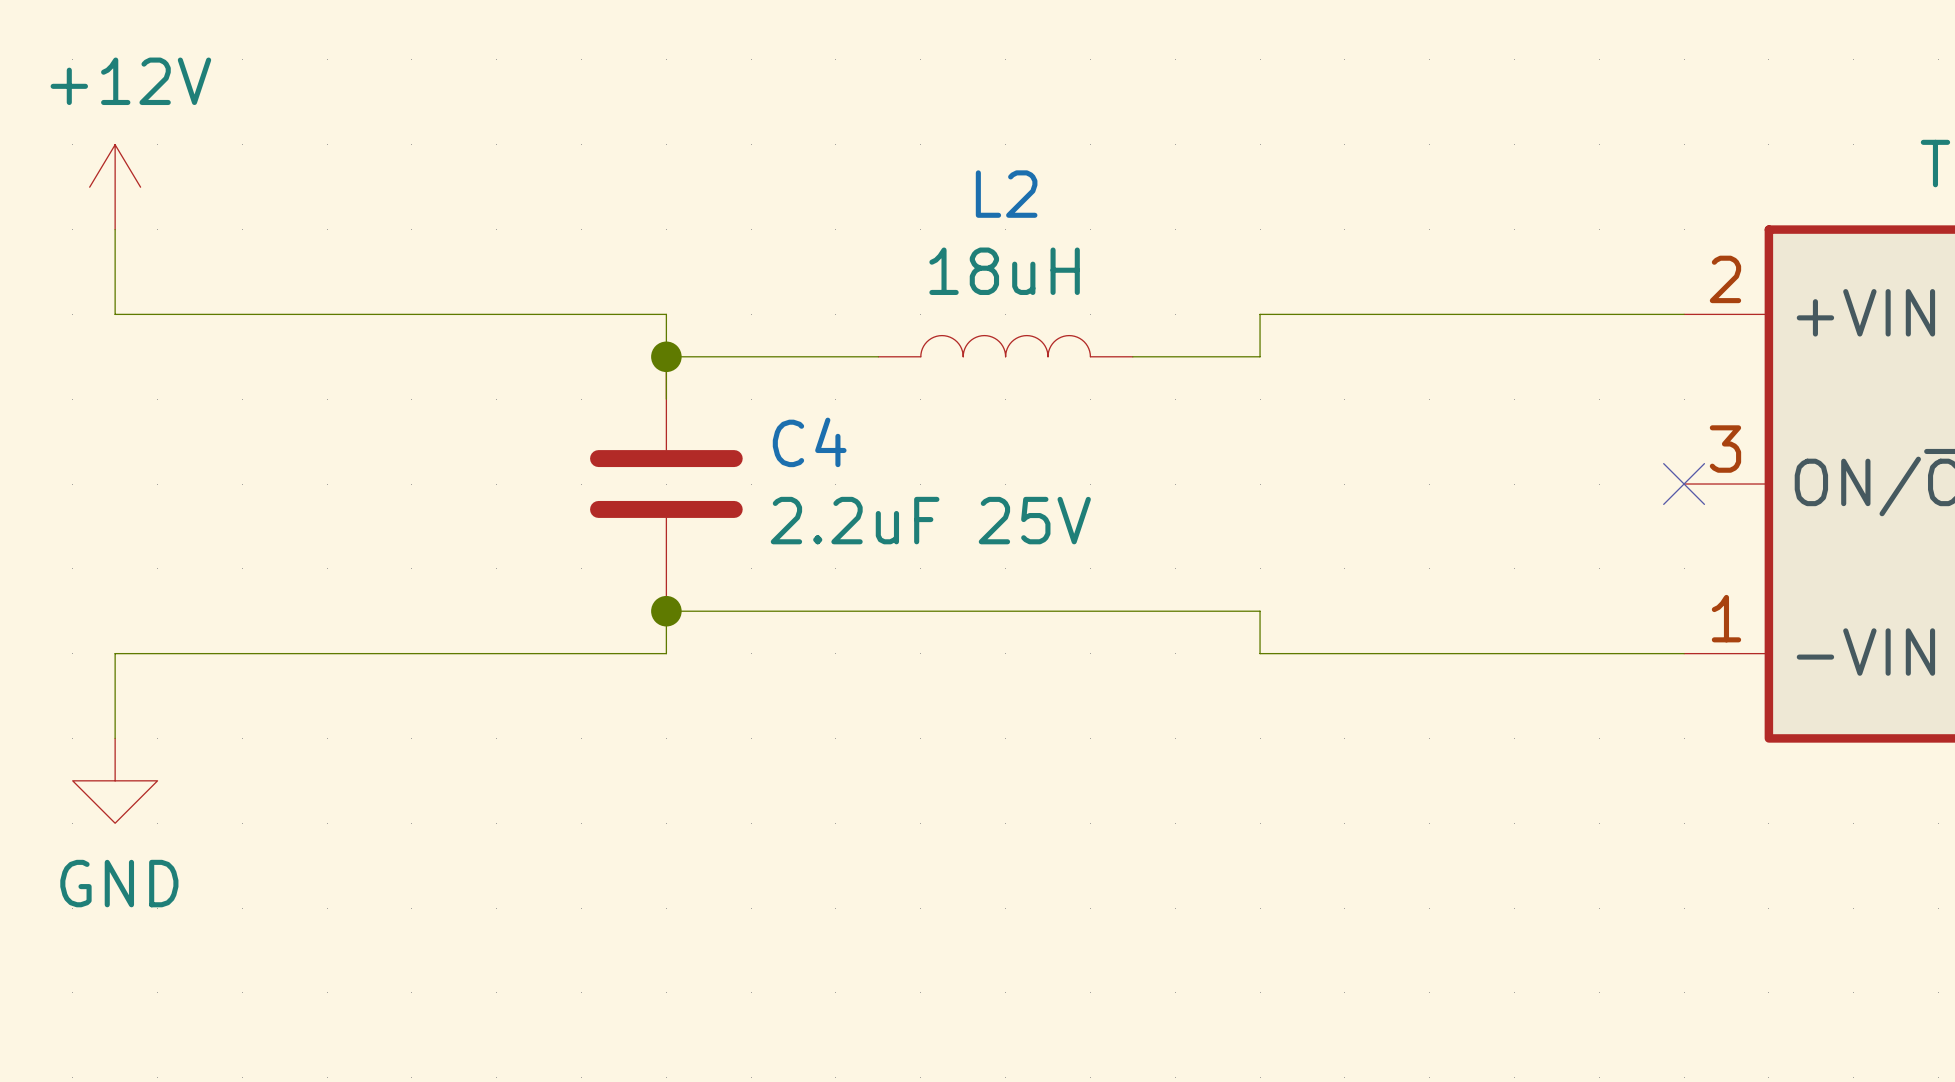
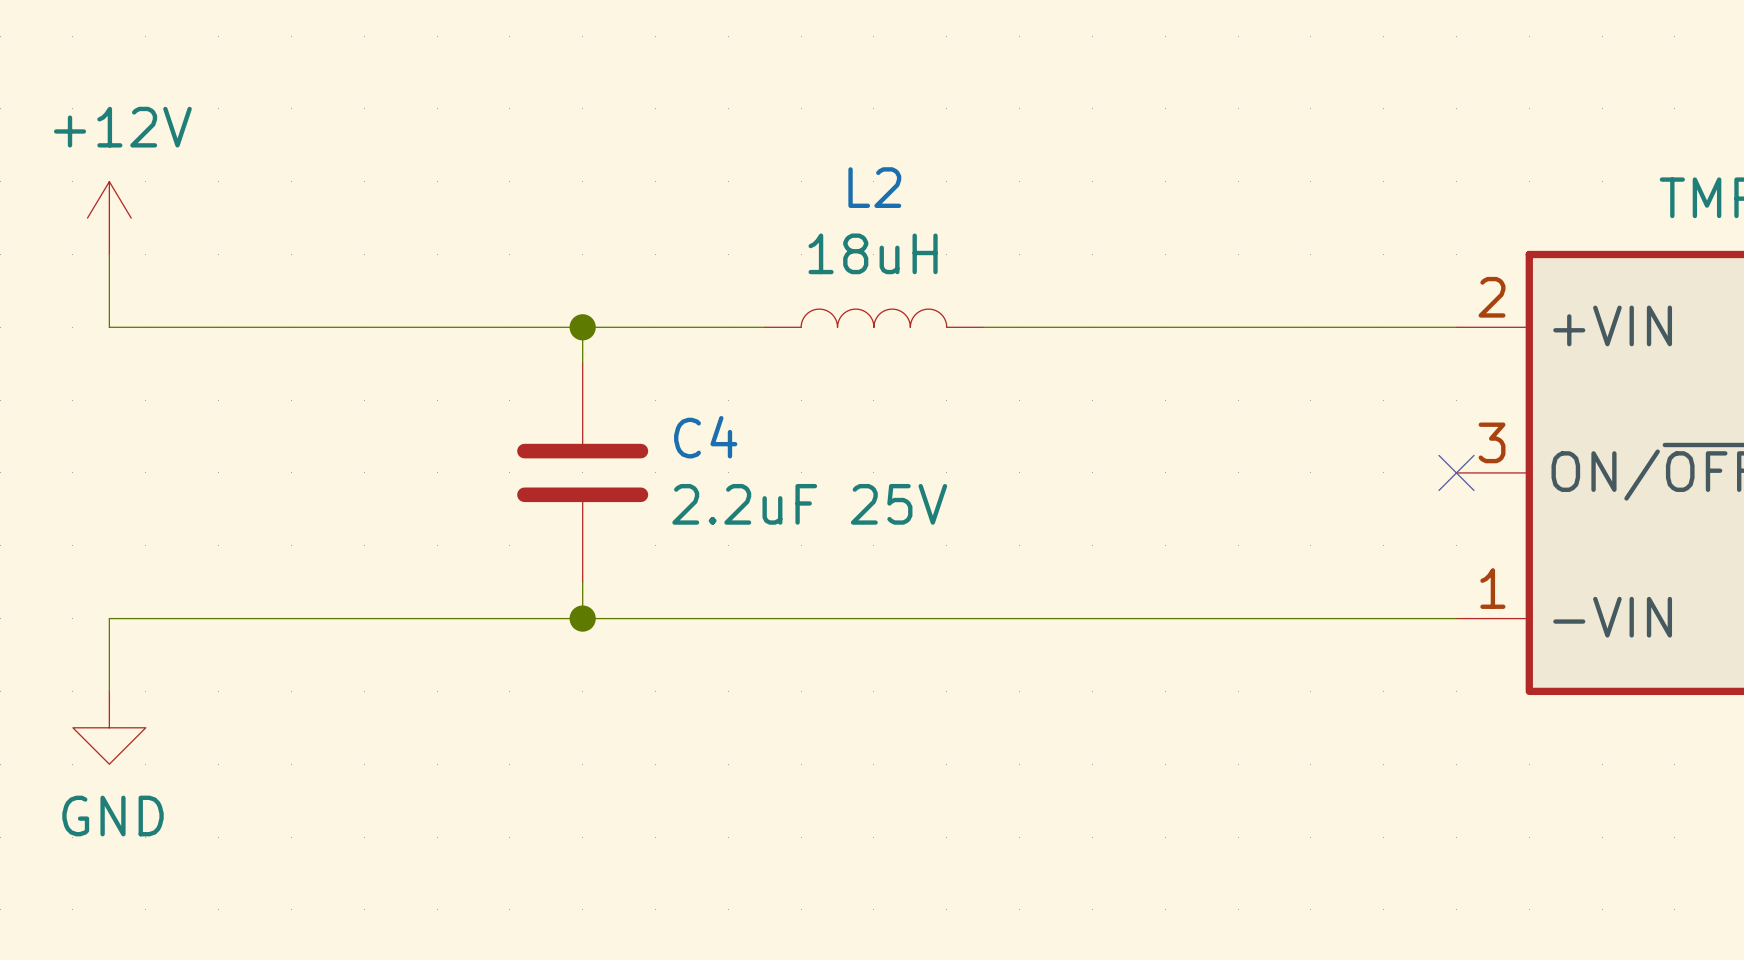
wire: none -> (582, 327) (764, 327)
wire: (1260, 314) (1260, 356) (1132, 356) -> (1092, 327) (983, 327)
L2 position: (1005, 346) -> (873, 318)
junction position: (666, 356) -> (582, 327)
wire: (878, 356) (666, 356) (666, 399) -> none
wire: (666, 611) (1260, 611) (1260, 653) -> (582, 618) (1092, 618)
junction position: (666, 611) -> (582, 618)

